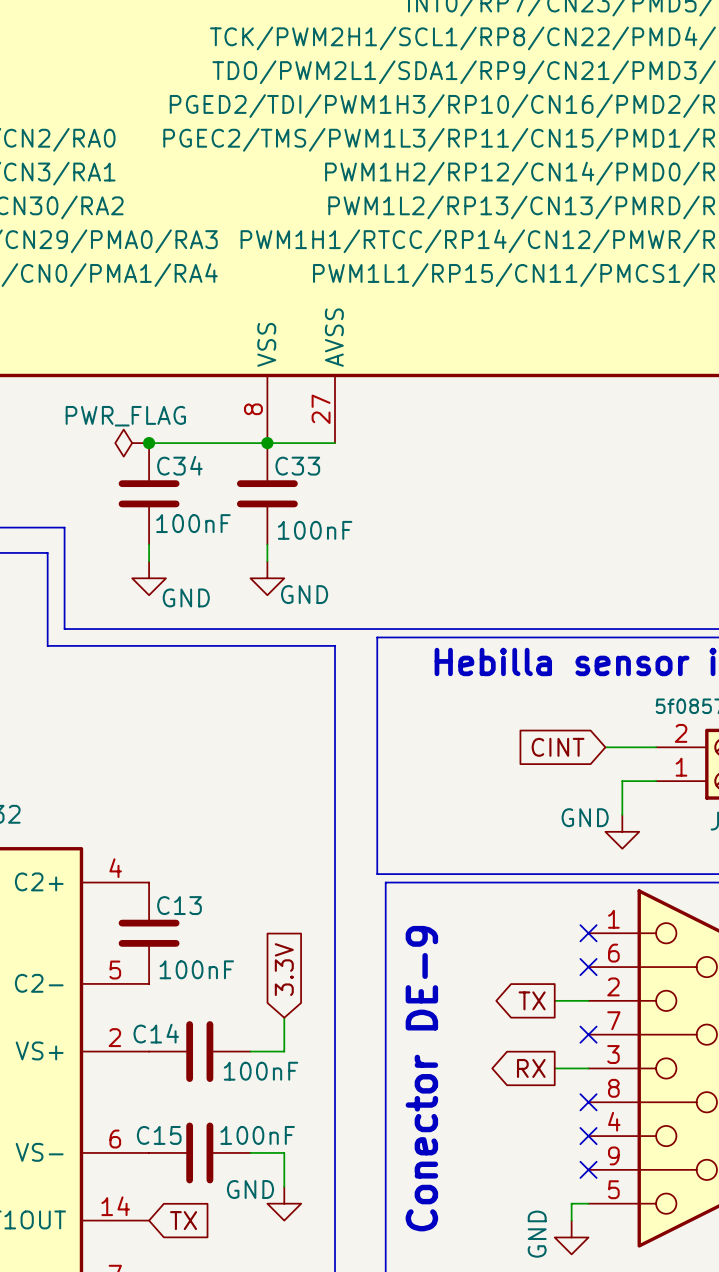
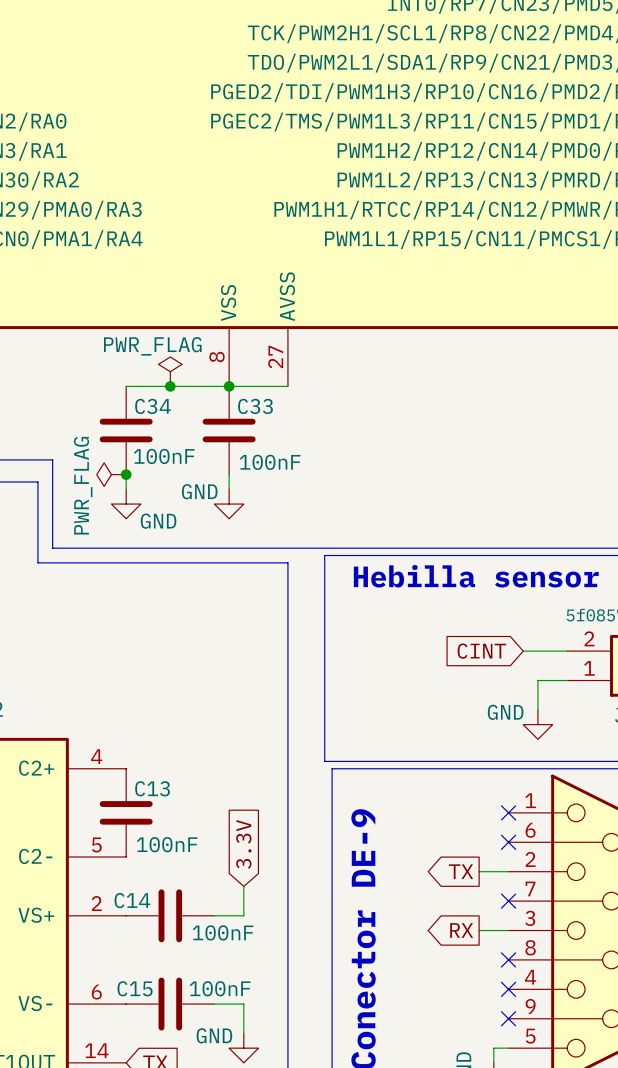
power symbol: none -> PWR_FLAG (170, 371)
power symbol: PWR_FLAG (132, 443) -> none
junction: (149, 443) -> none
junction: none -> (170, 386)
power symbol: none -> PWR_FLAG (111, 474)
junction: none -> (126, 474)
power symbol text position: GND (304, 594) -> GND (199, 491)

